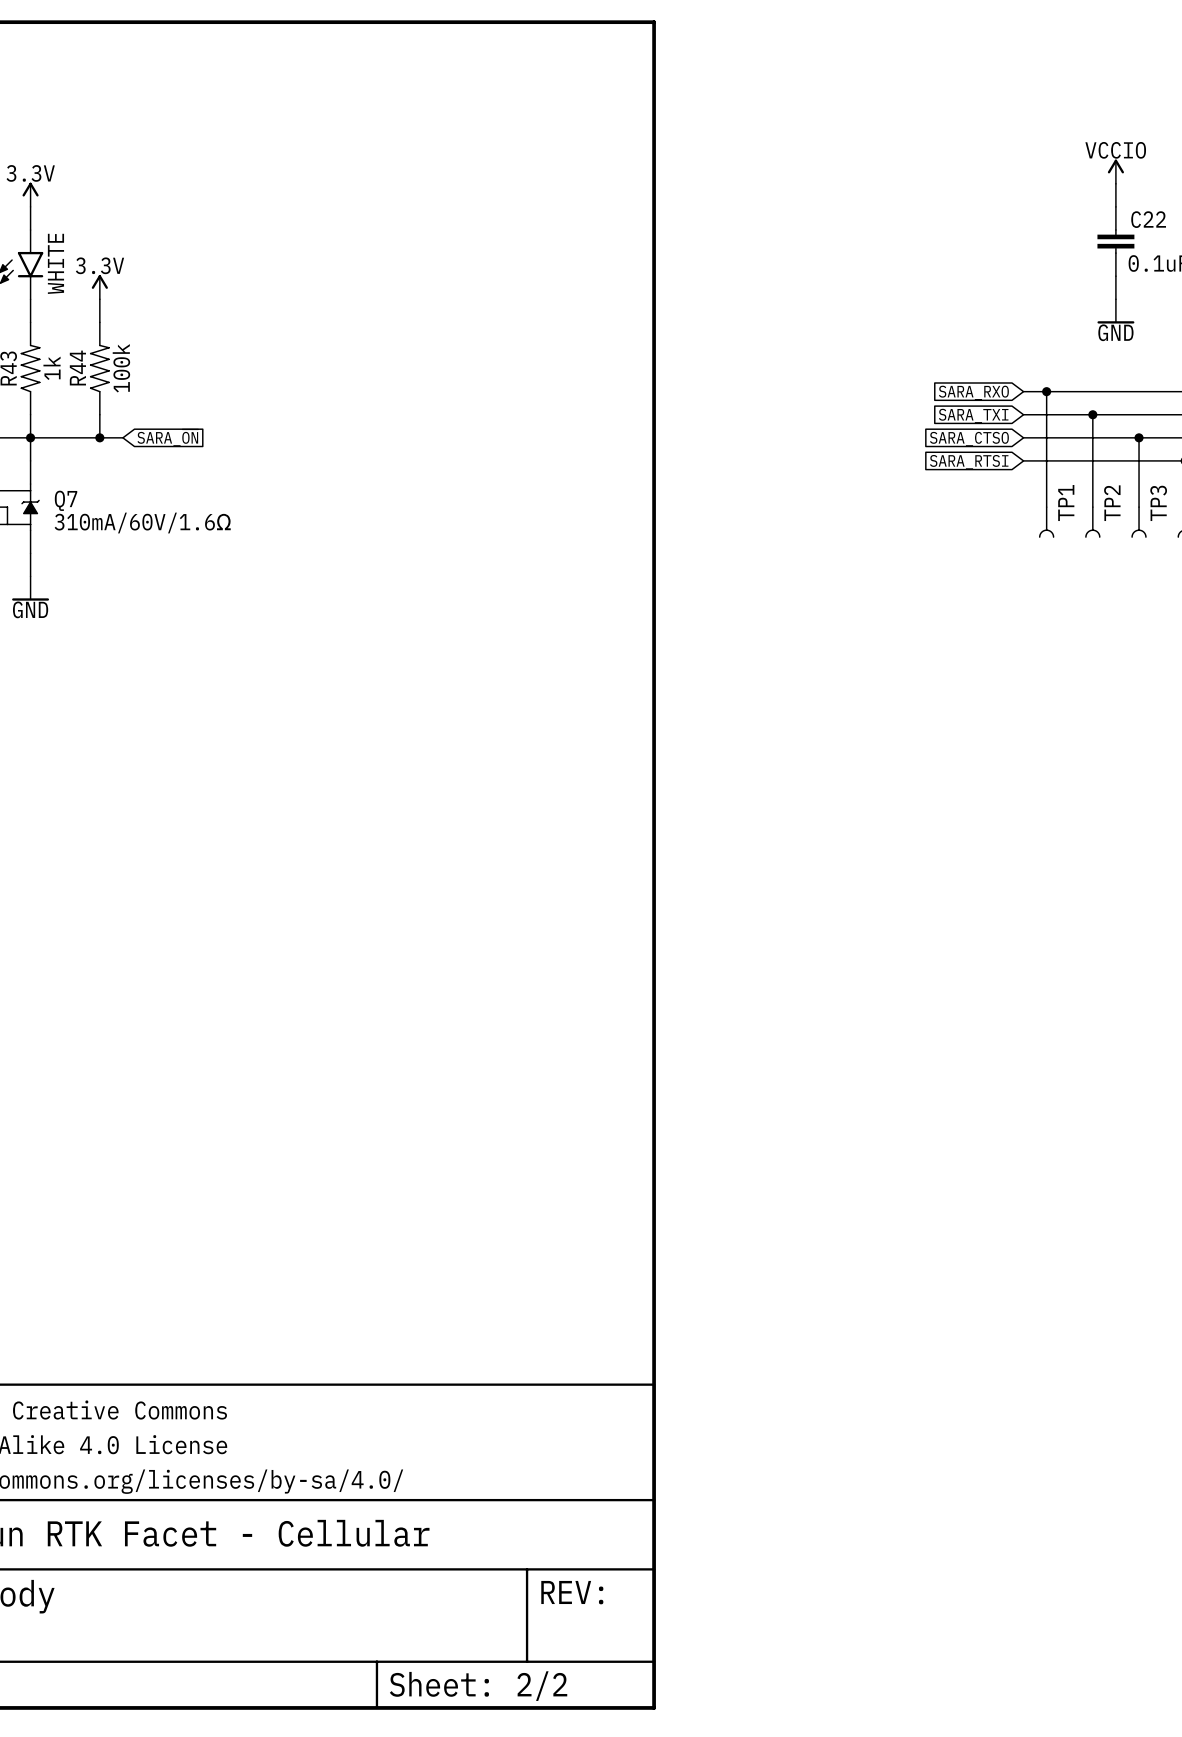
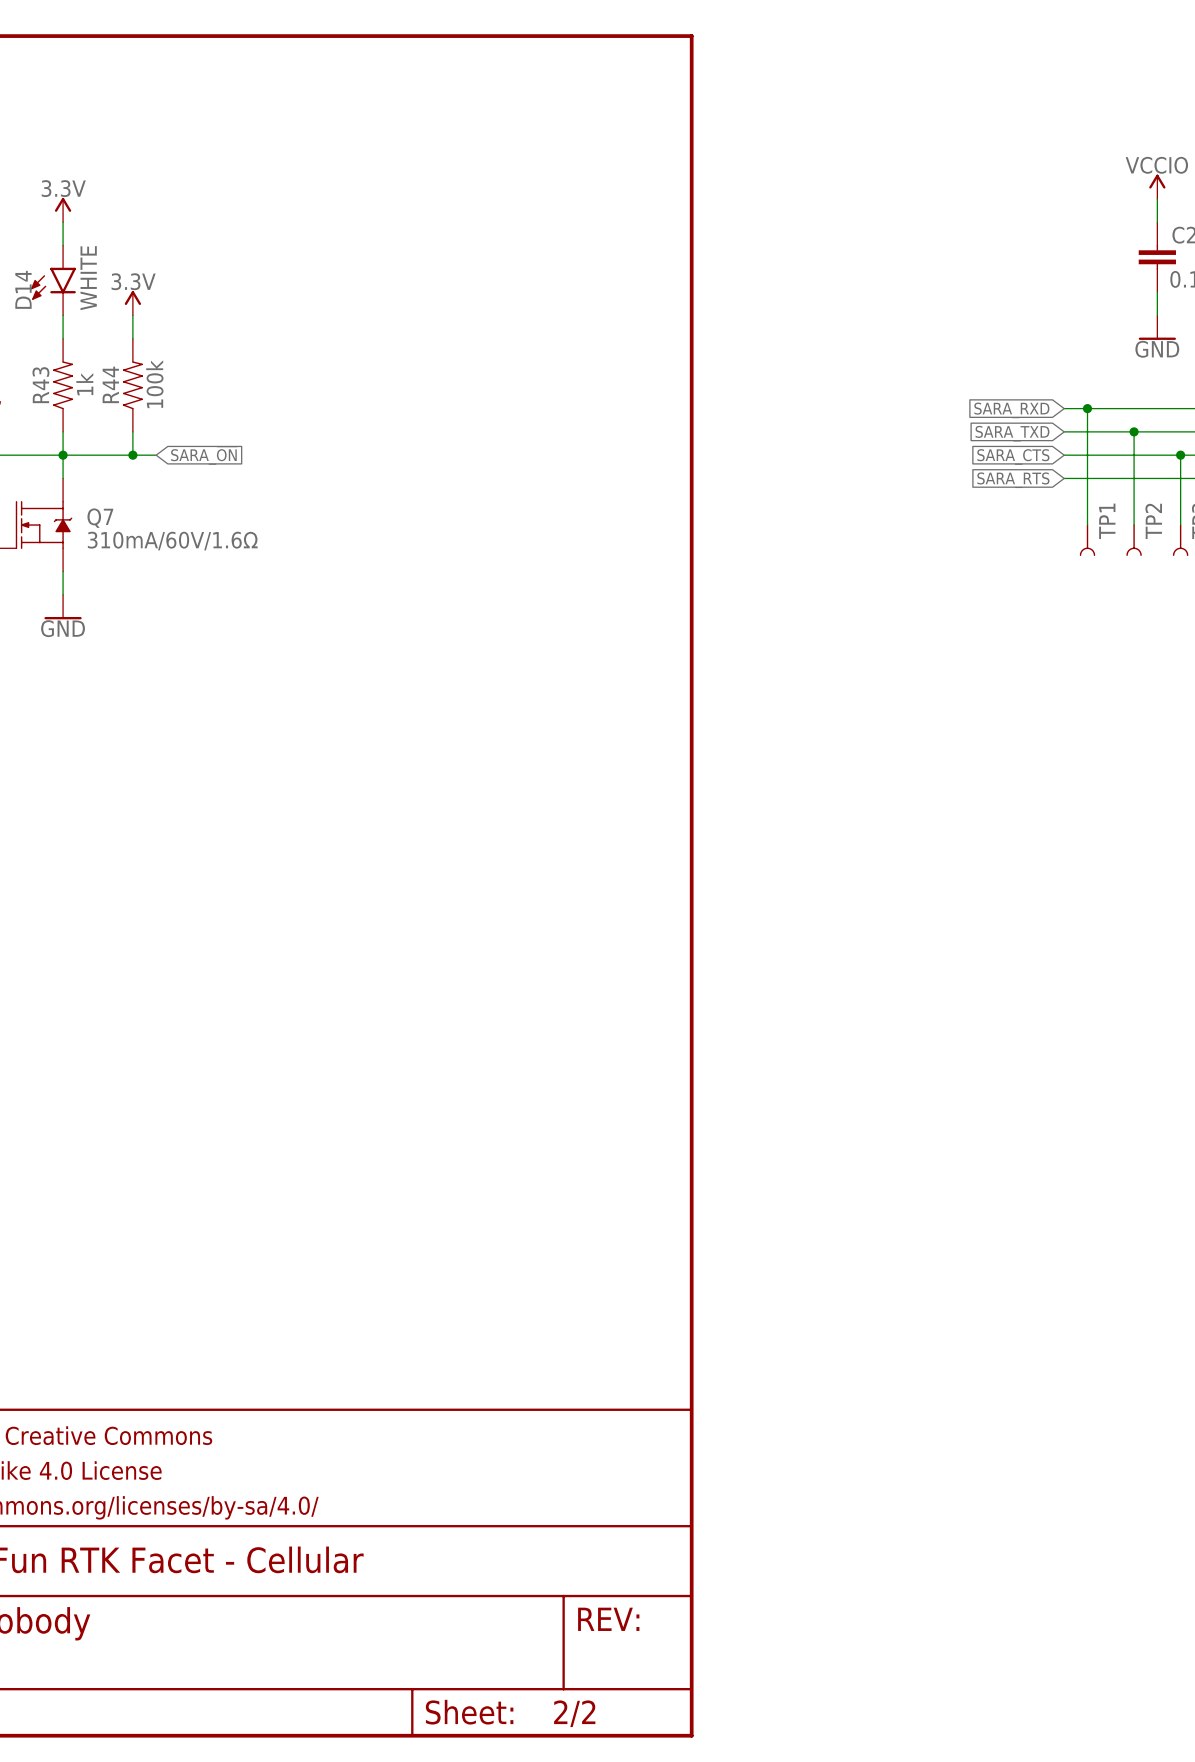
global label: SARA_RXO (973, 392) -> SARA_RXD (1011, 410)
global label: SARA_TXI (973, 416) -> SARA_TXD (1012, 433)
global label: SARA_CTSO (969, 439) -> SARA_CTS (1013, 456)
global label: SARA_RTSI (969, 462) -> SARA_RTS (1013, 480)

